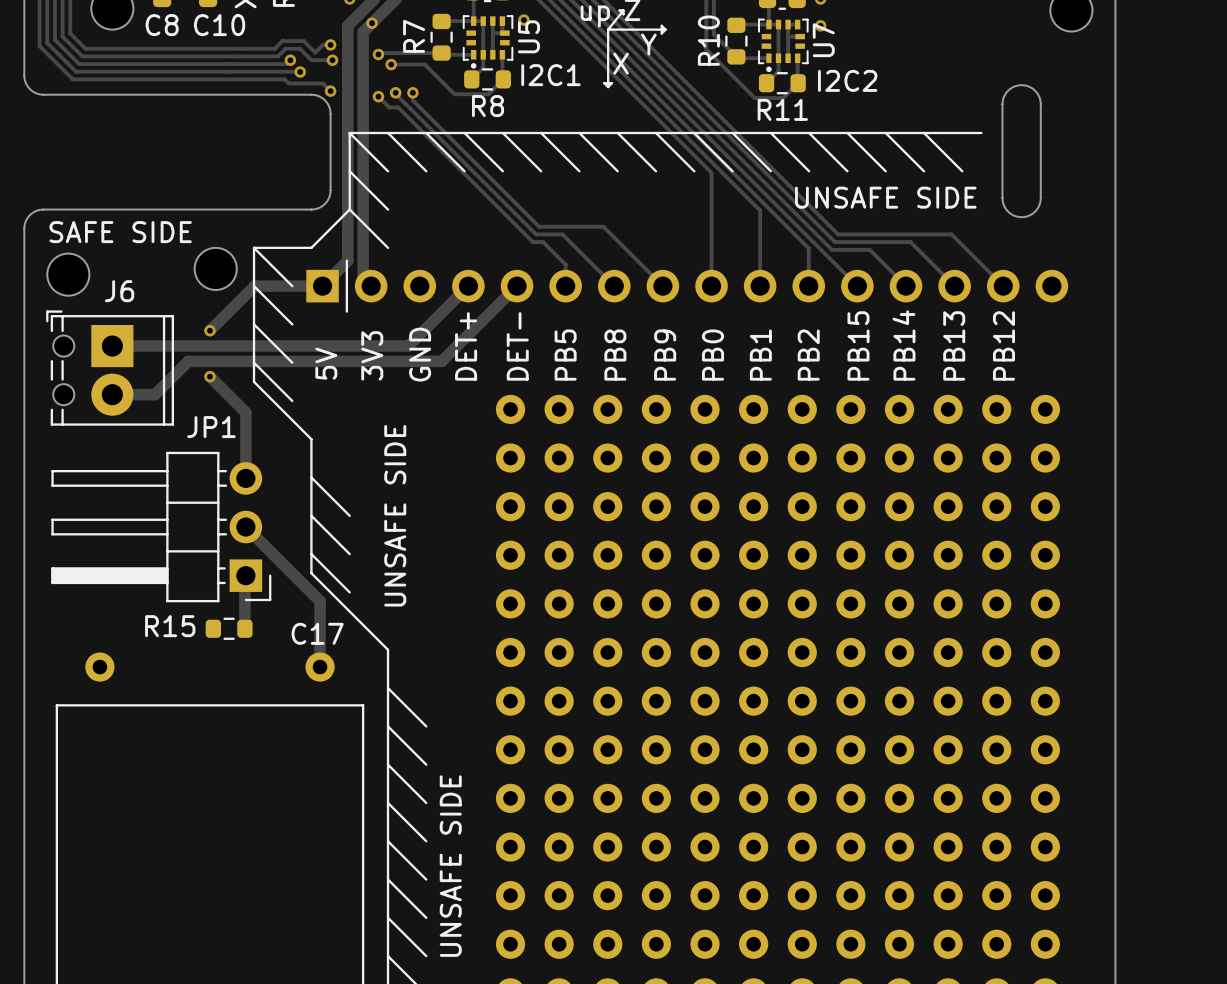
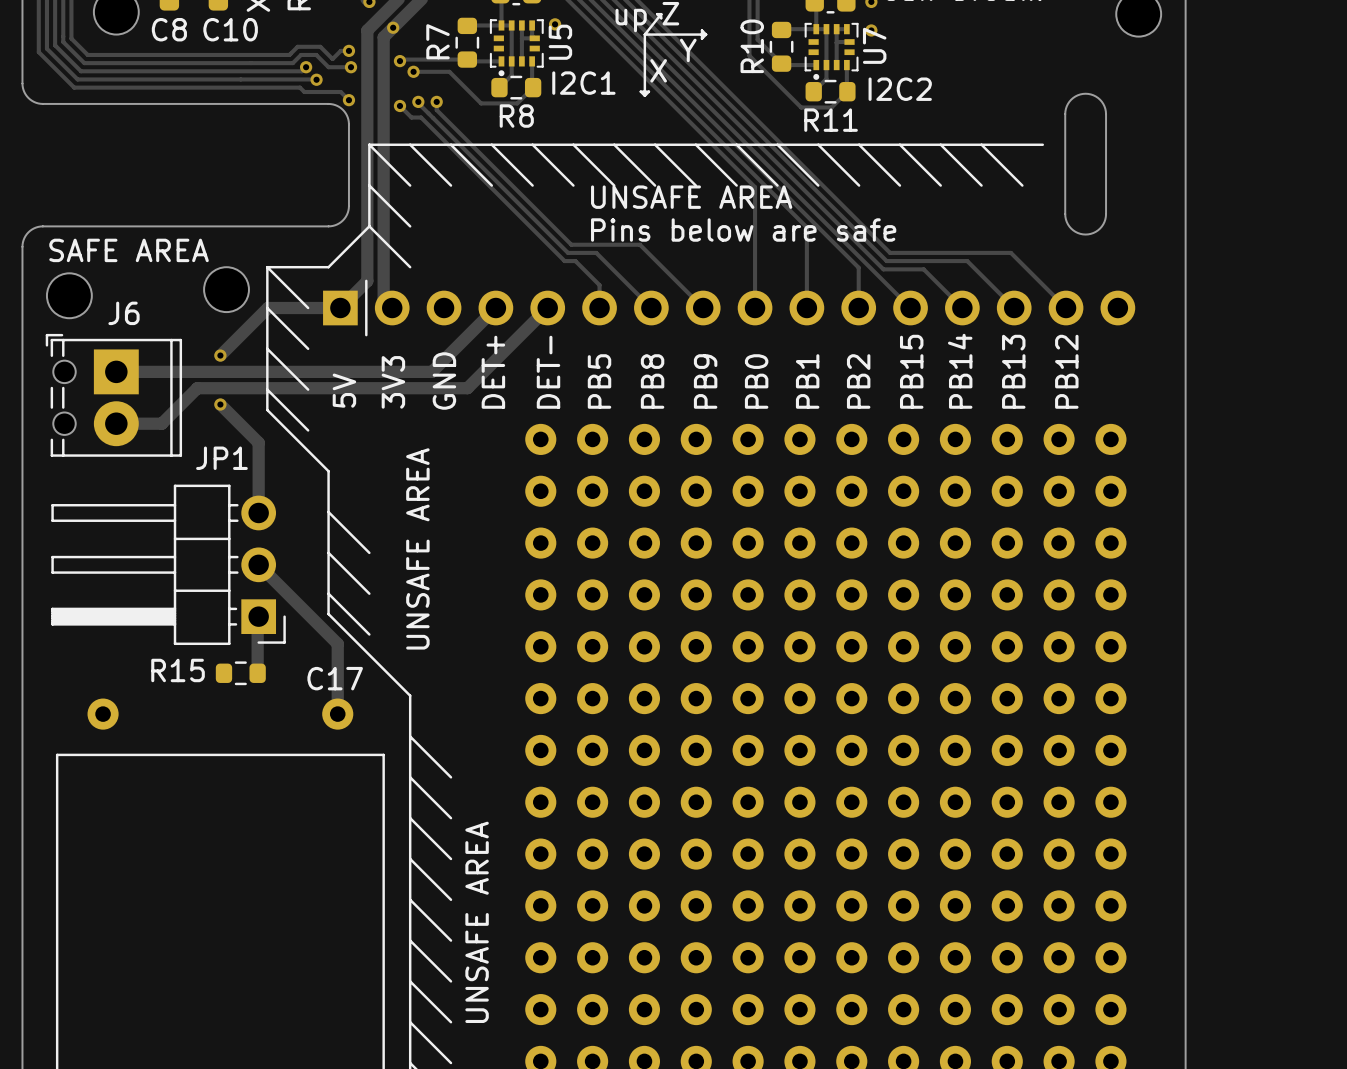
text: none -> UNSAFE AREA (691, 197)
text: UNSAFE SIDE (885, 197) -> none
text: none -> Pins below are safe (743, 230)
text: SAFE SIDE (120, 232) -> SAFE AREA (129, 250)
text: UNSAFE SIDE (395, 515) -> UNSAFE AREA (417, 548)
text: UNSAFE SIDE (450, 866) -> UNSAFE AREA (477, 922)

